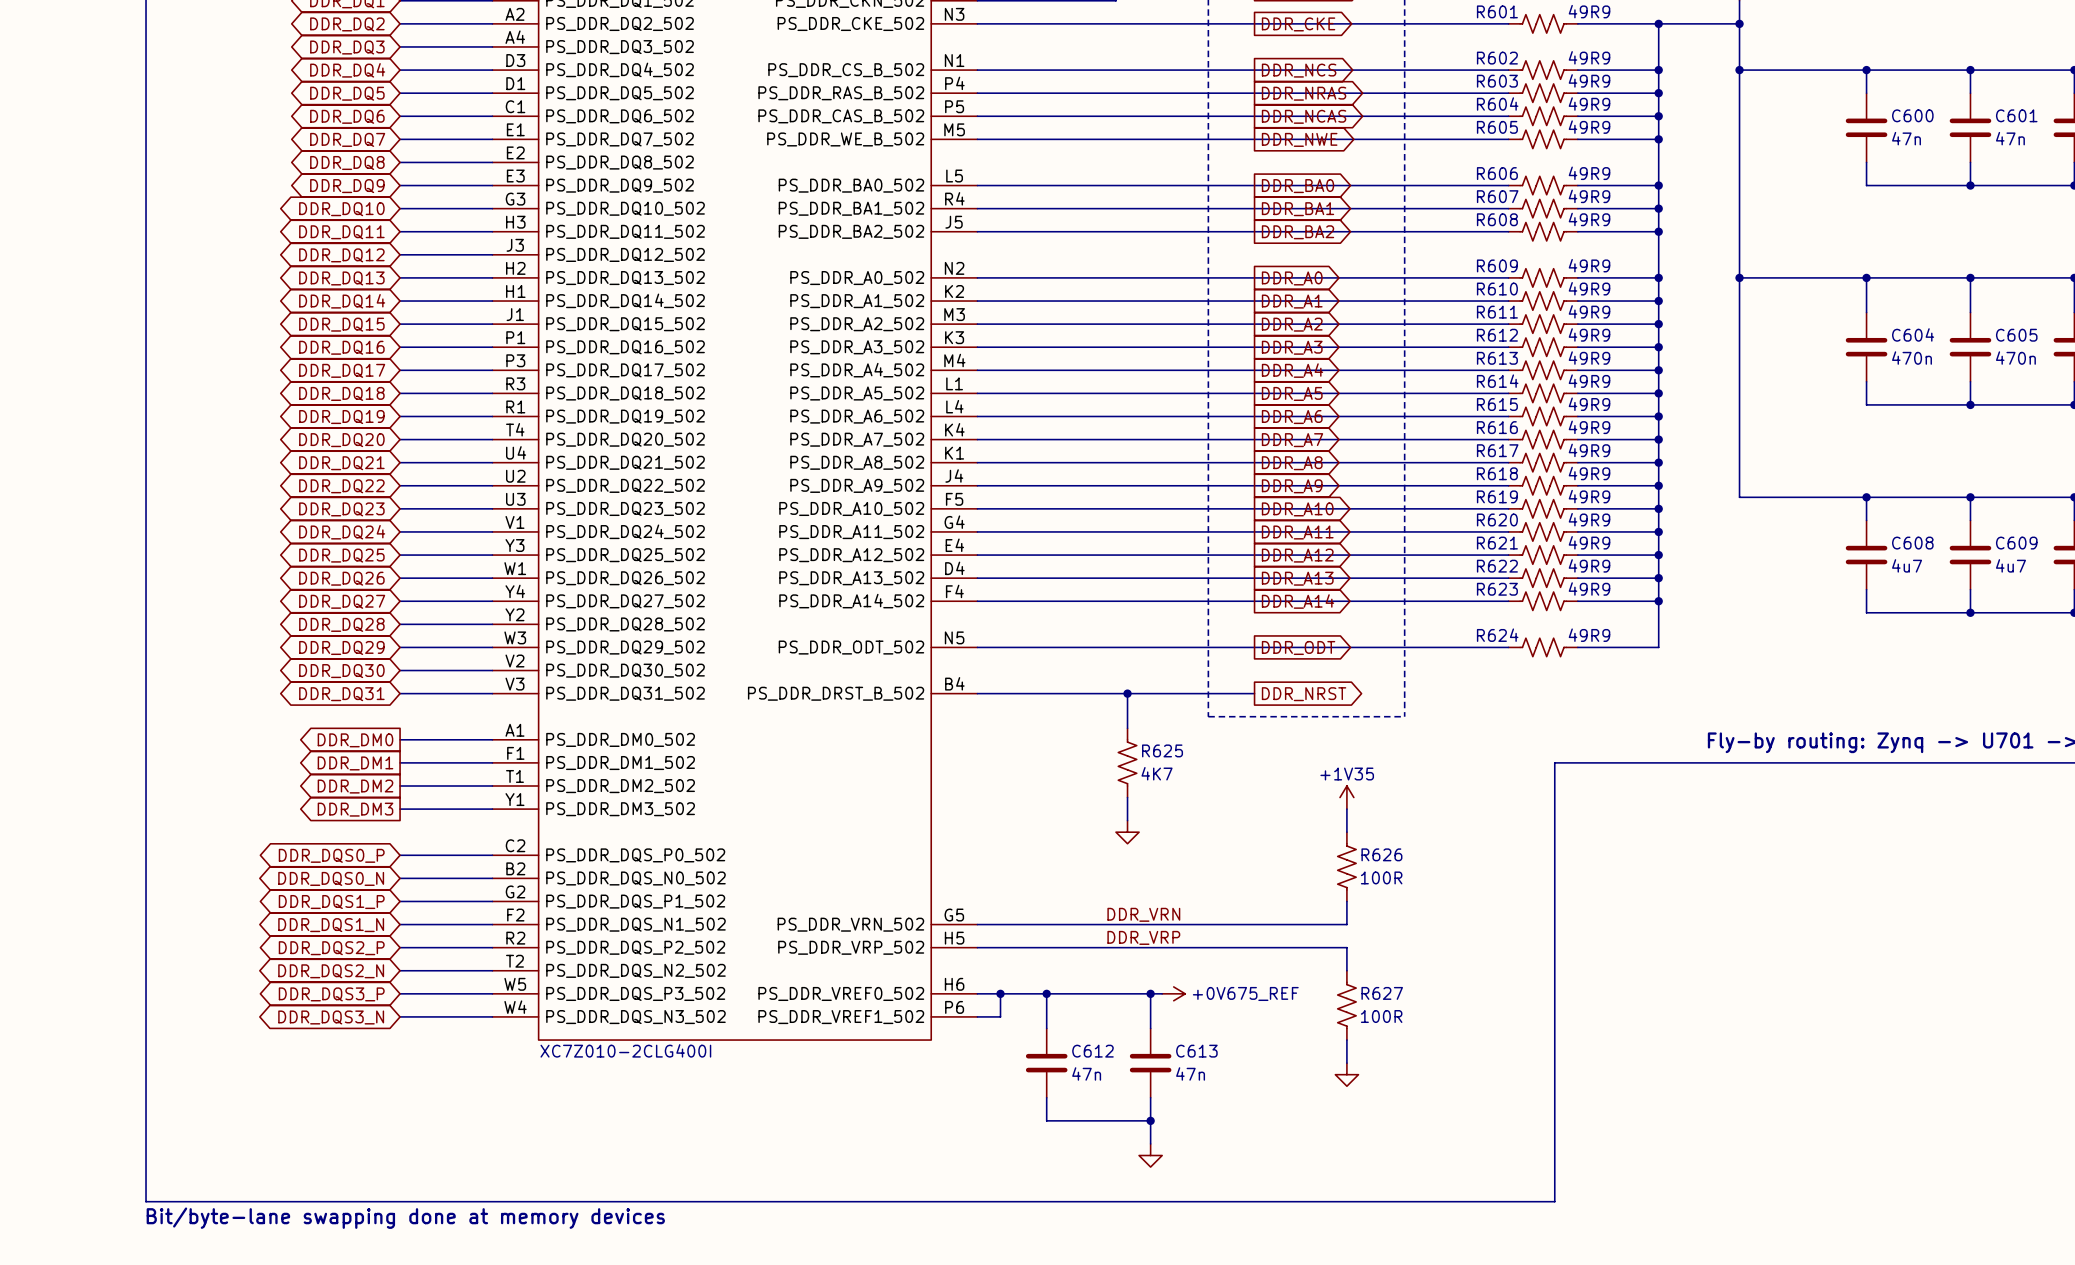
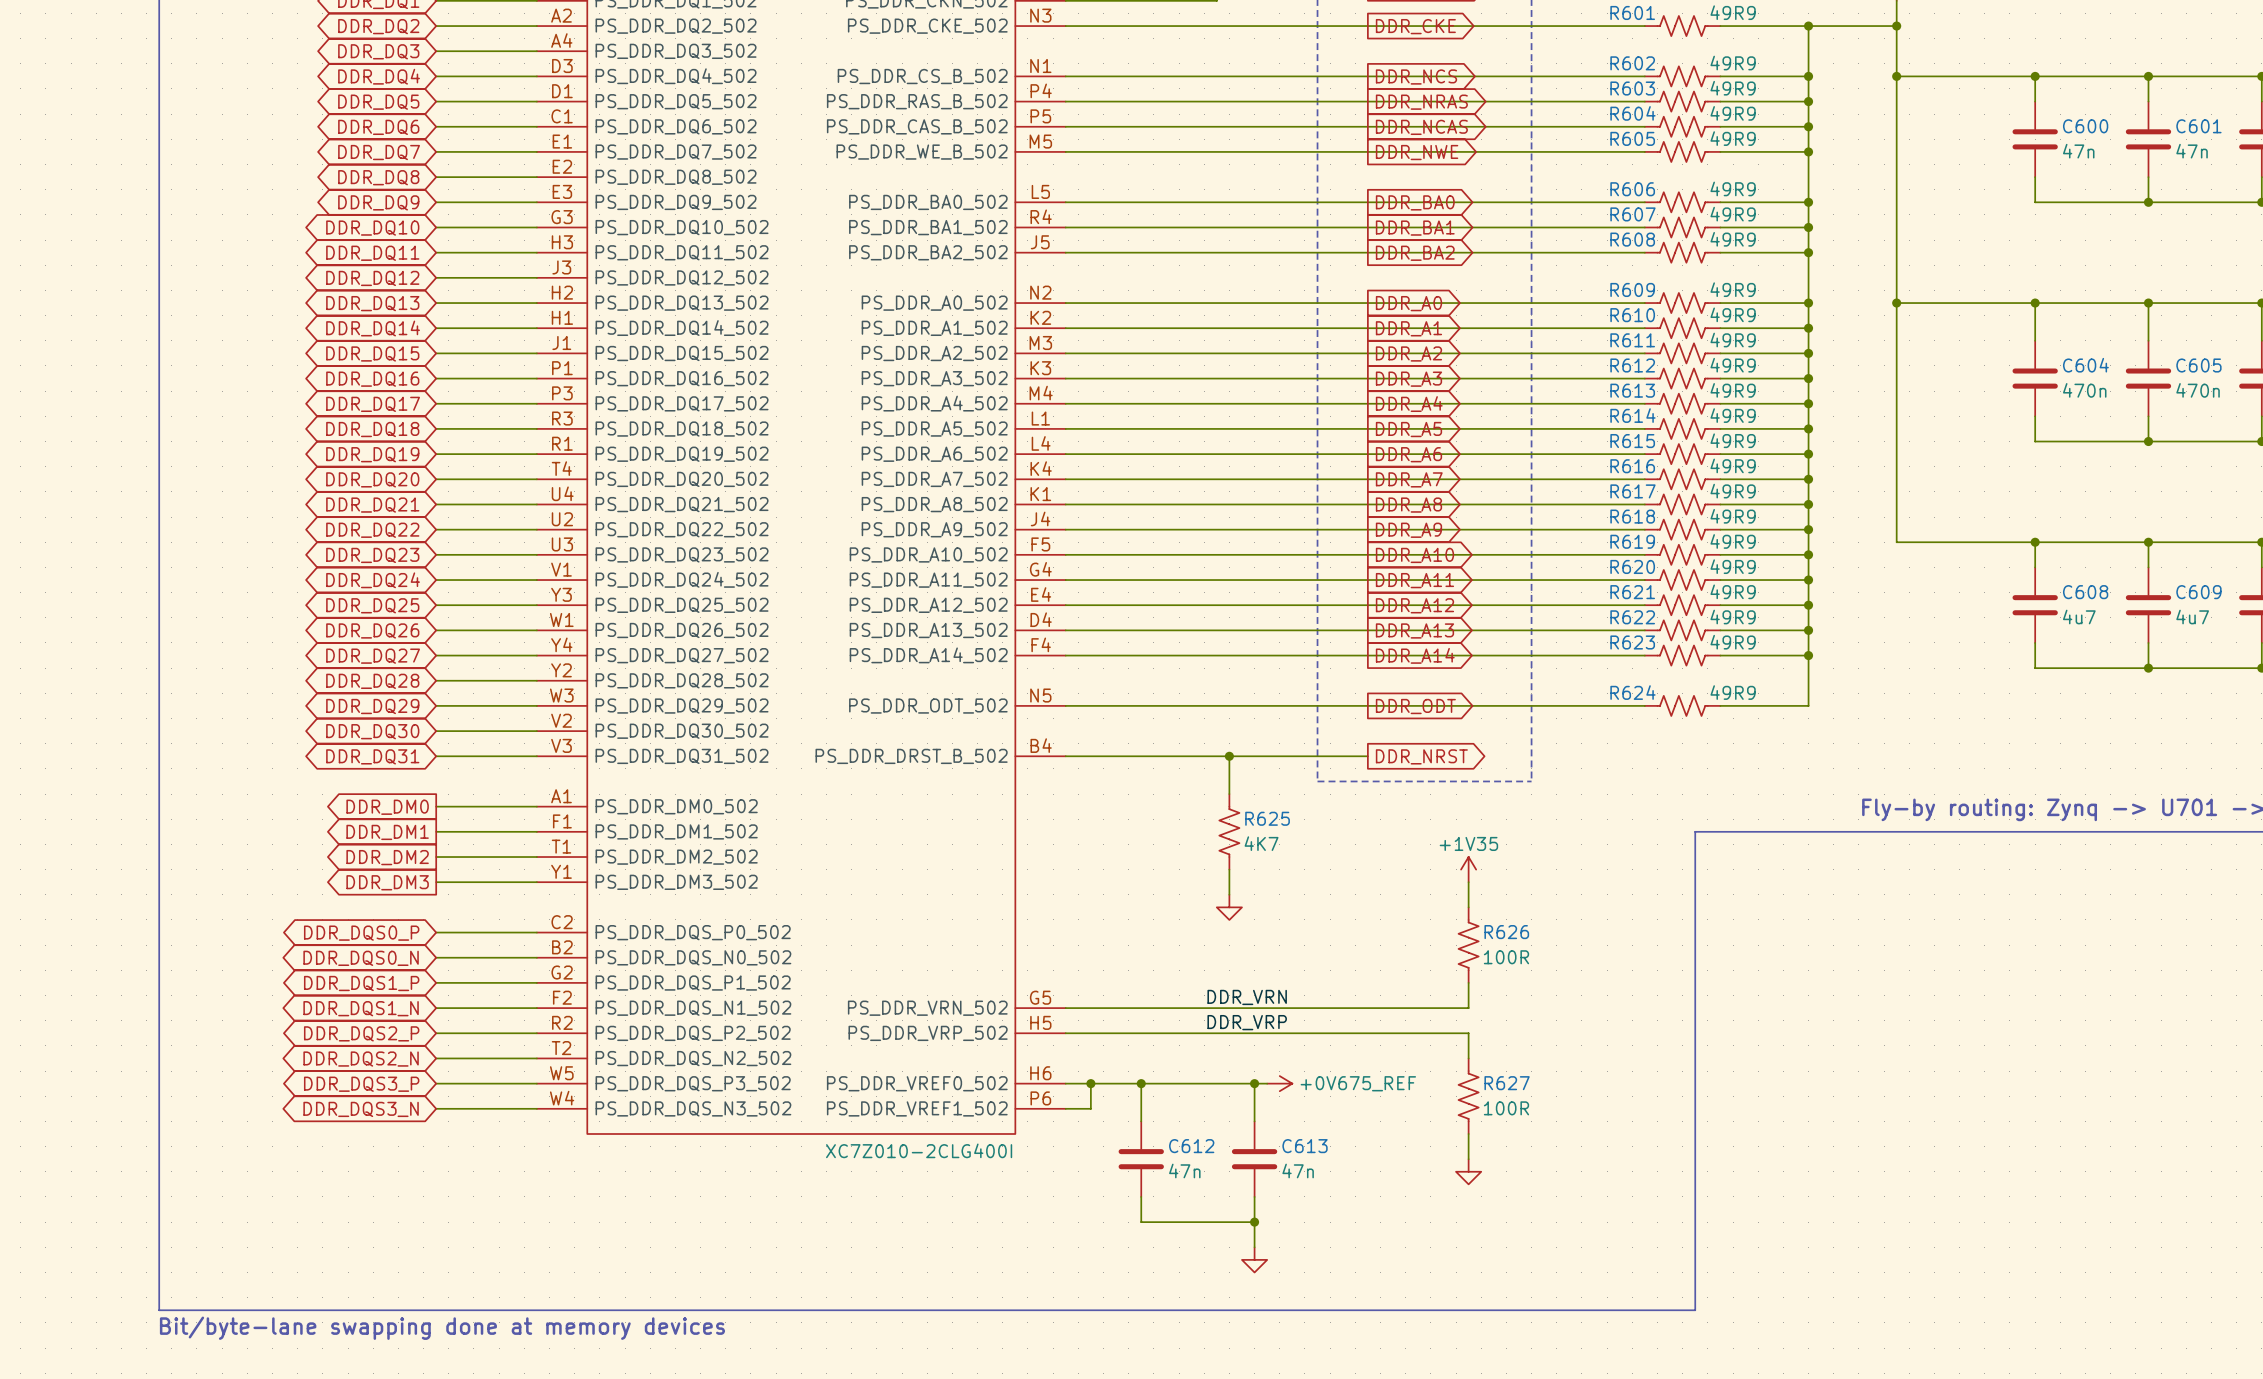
part value position: XC7Z010-2CLG400I (625, 1050) -> XC7Z010-2CLG400I (919, 1150)

